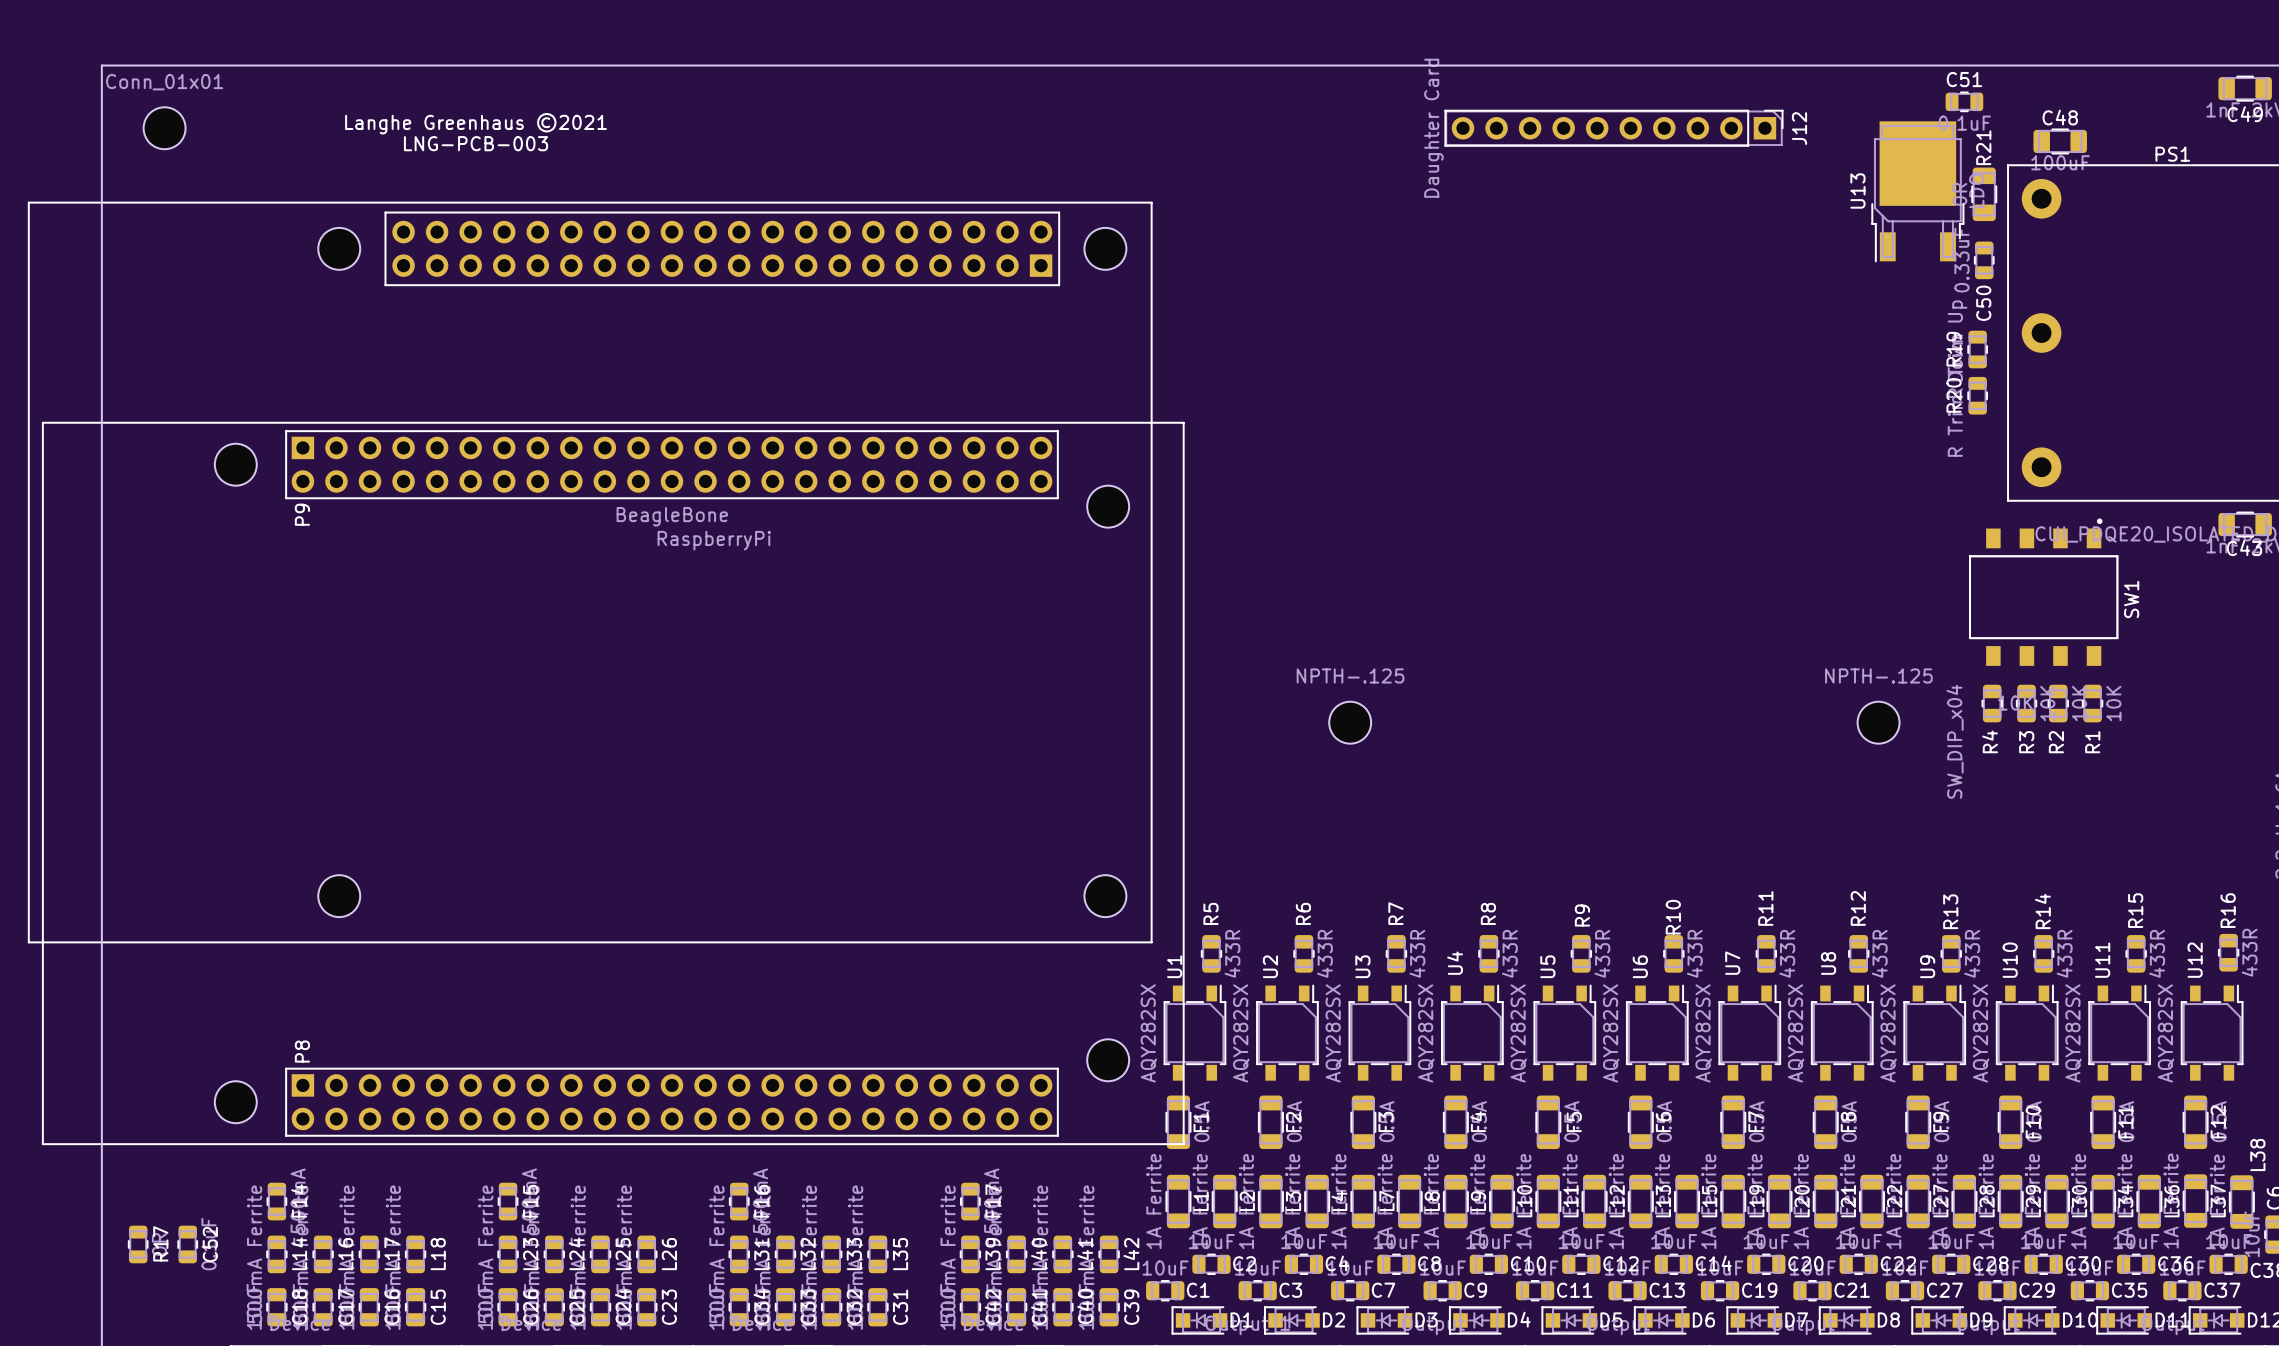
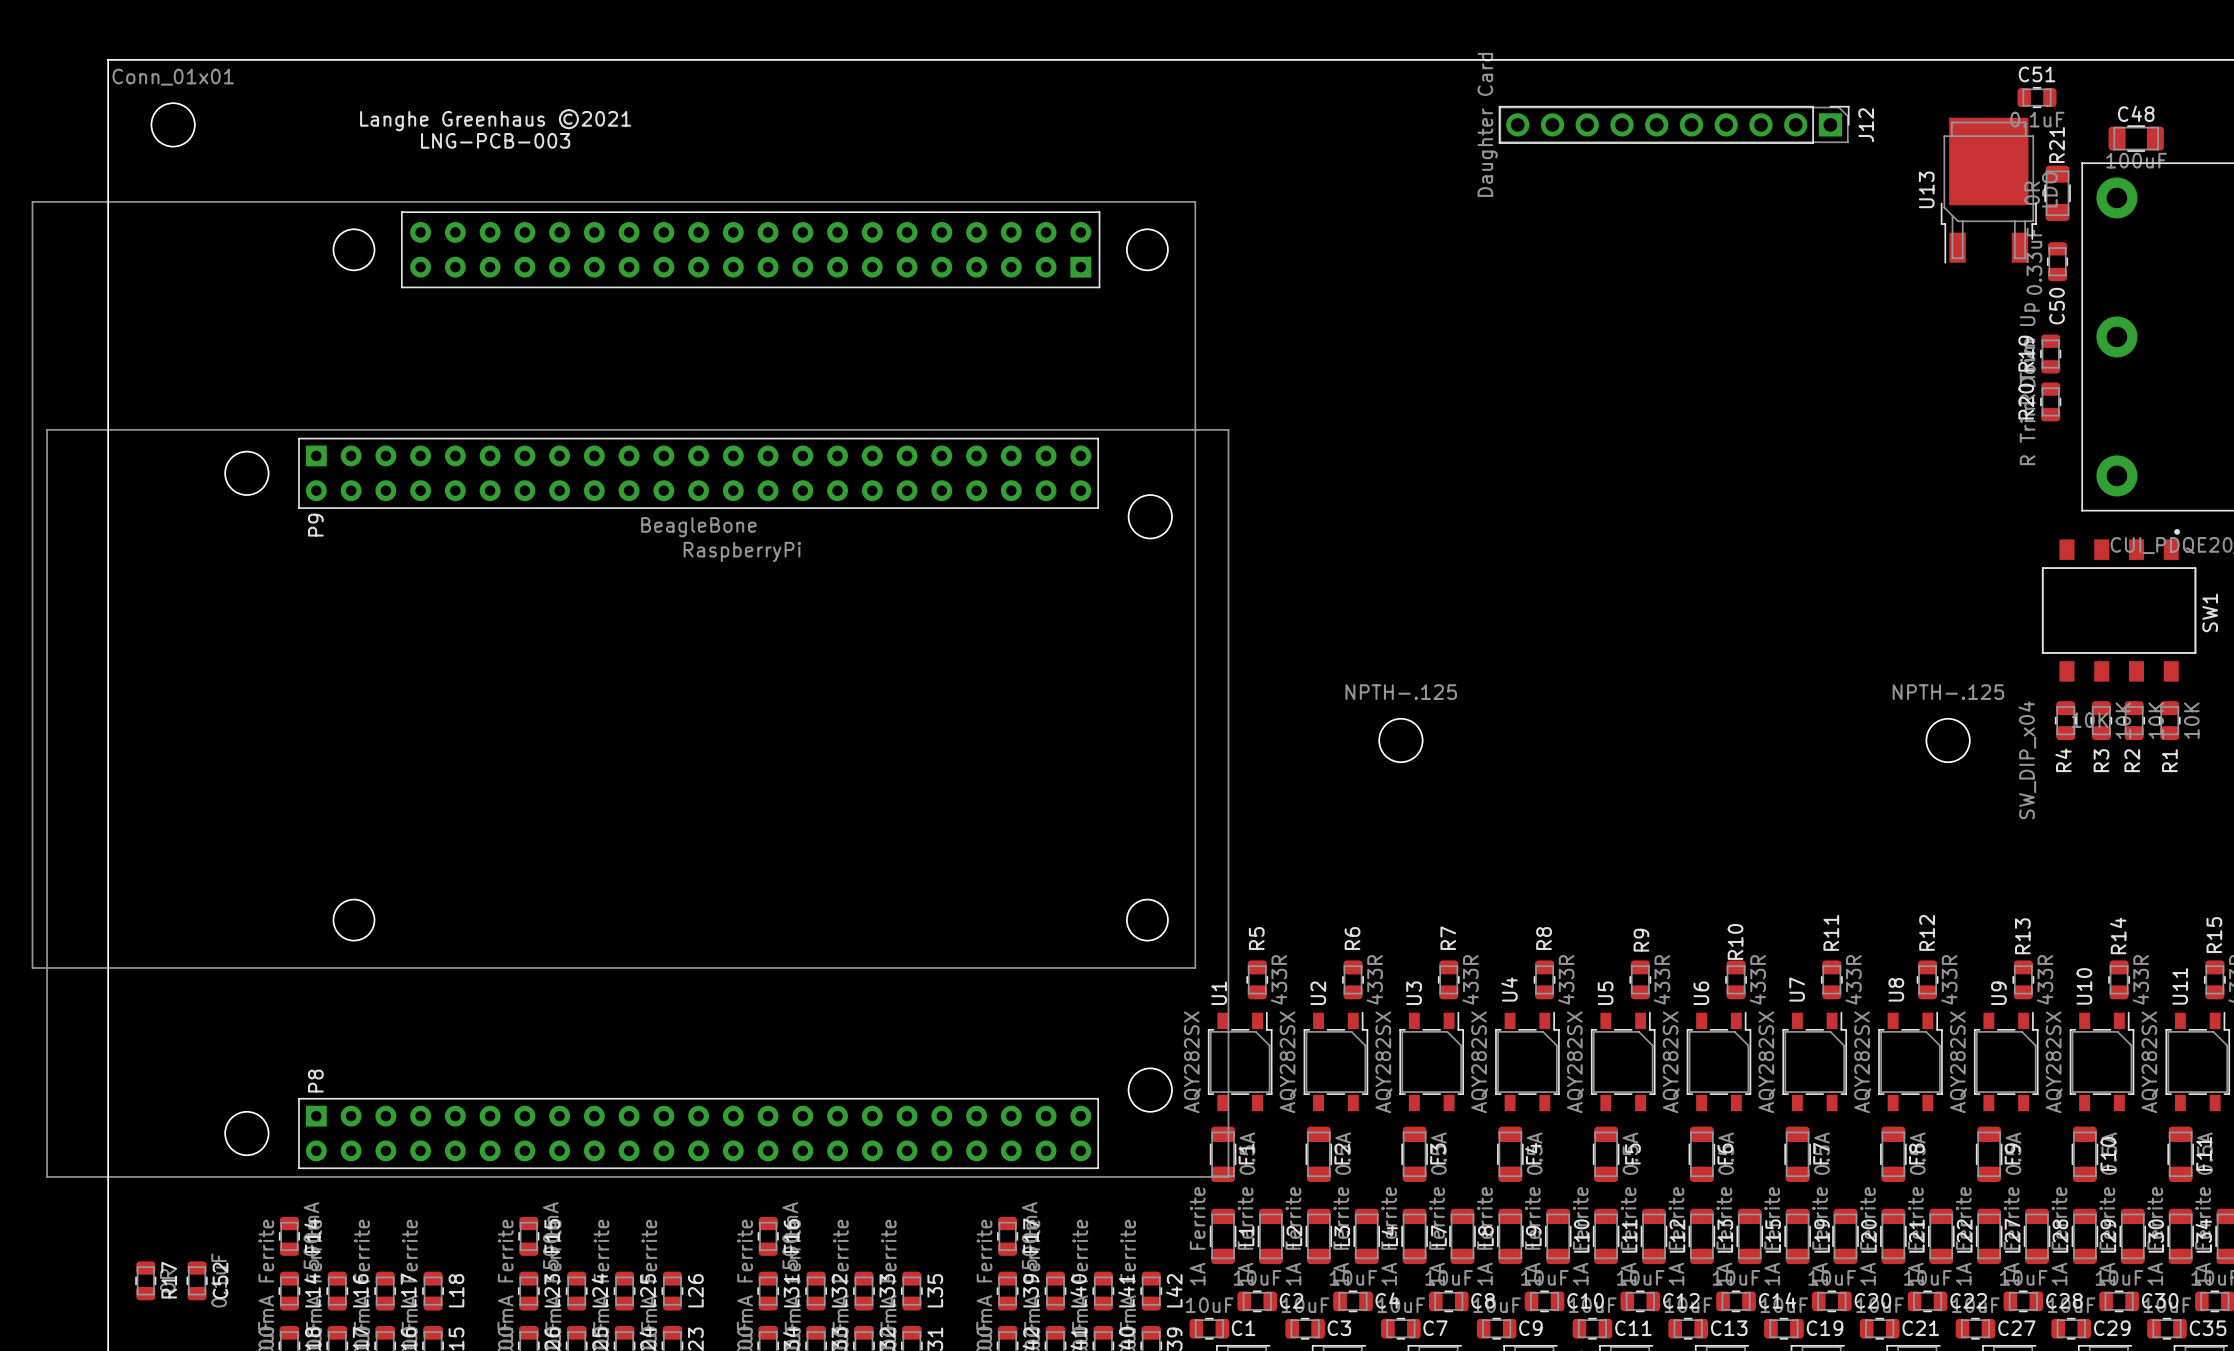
part footprint: [28, 201, 1153, 944] -> [31, 201, 1197, 969]
part footprint: [42, 421, 1185, 1145] -> [46, 429, 1230, 1178]

